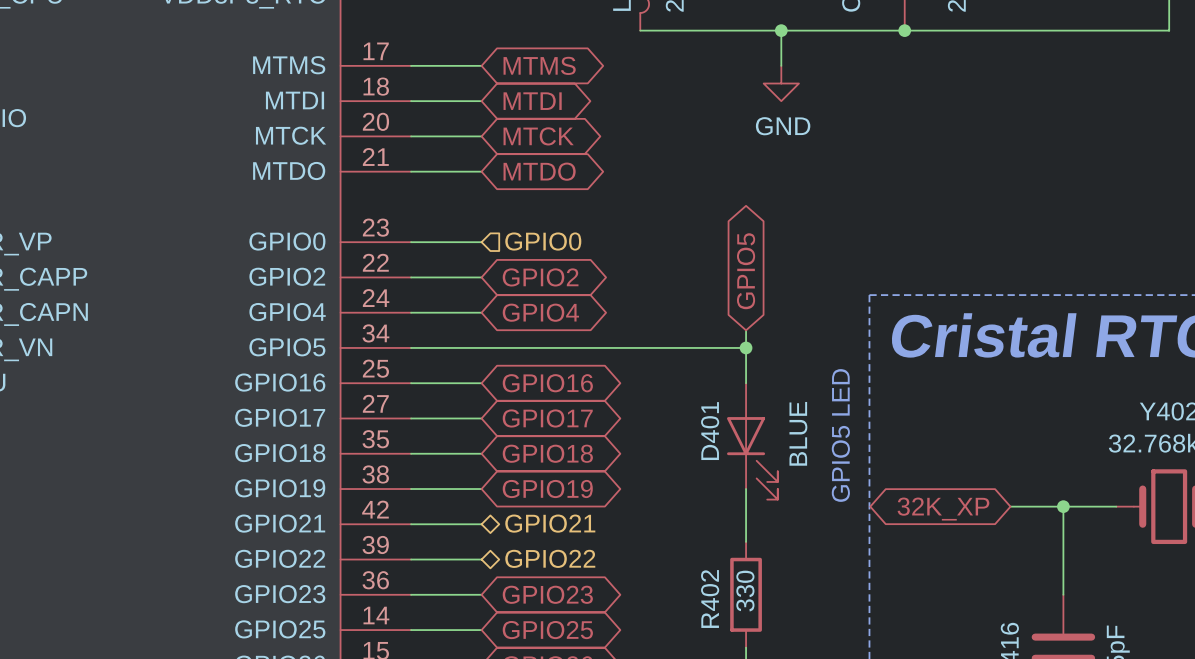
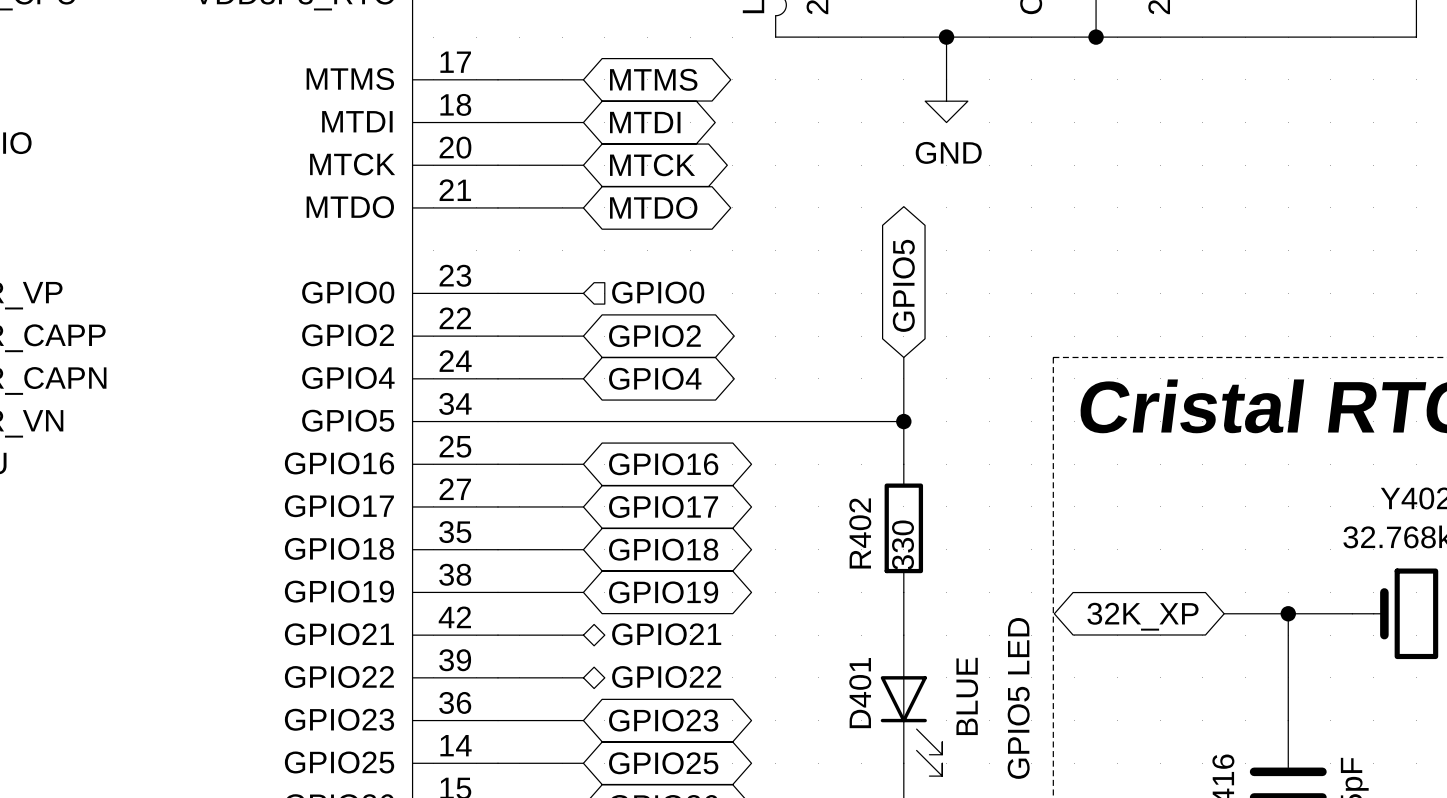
global label position: GPIO5 (746, 271) -> GPIO5 (903, 285)
wire: none -> (903, 357) (903, 400)
text position: GPIO5 LED (840, 435) -> GPIO5 LED (1018, 698)
D401 position: (752, 441) -> (911, 705)
R402 value position: 330 (745, 591) -> 330 (903, 545)
R402 position: (746, 594) -> (903, 528)

